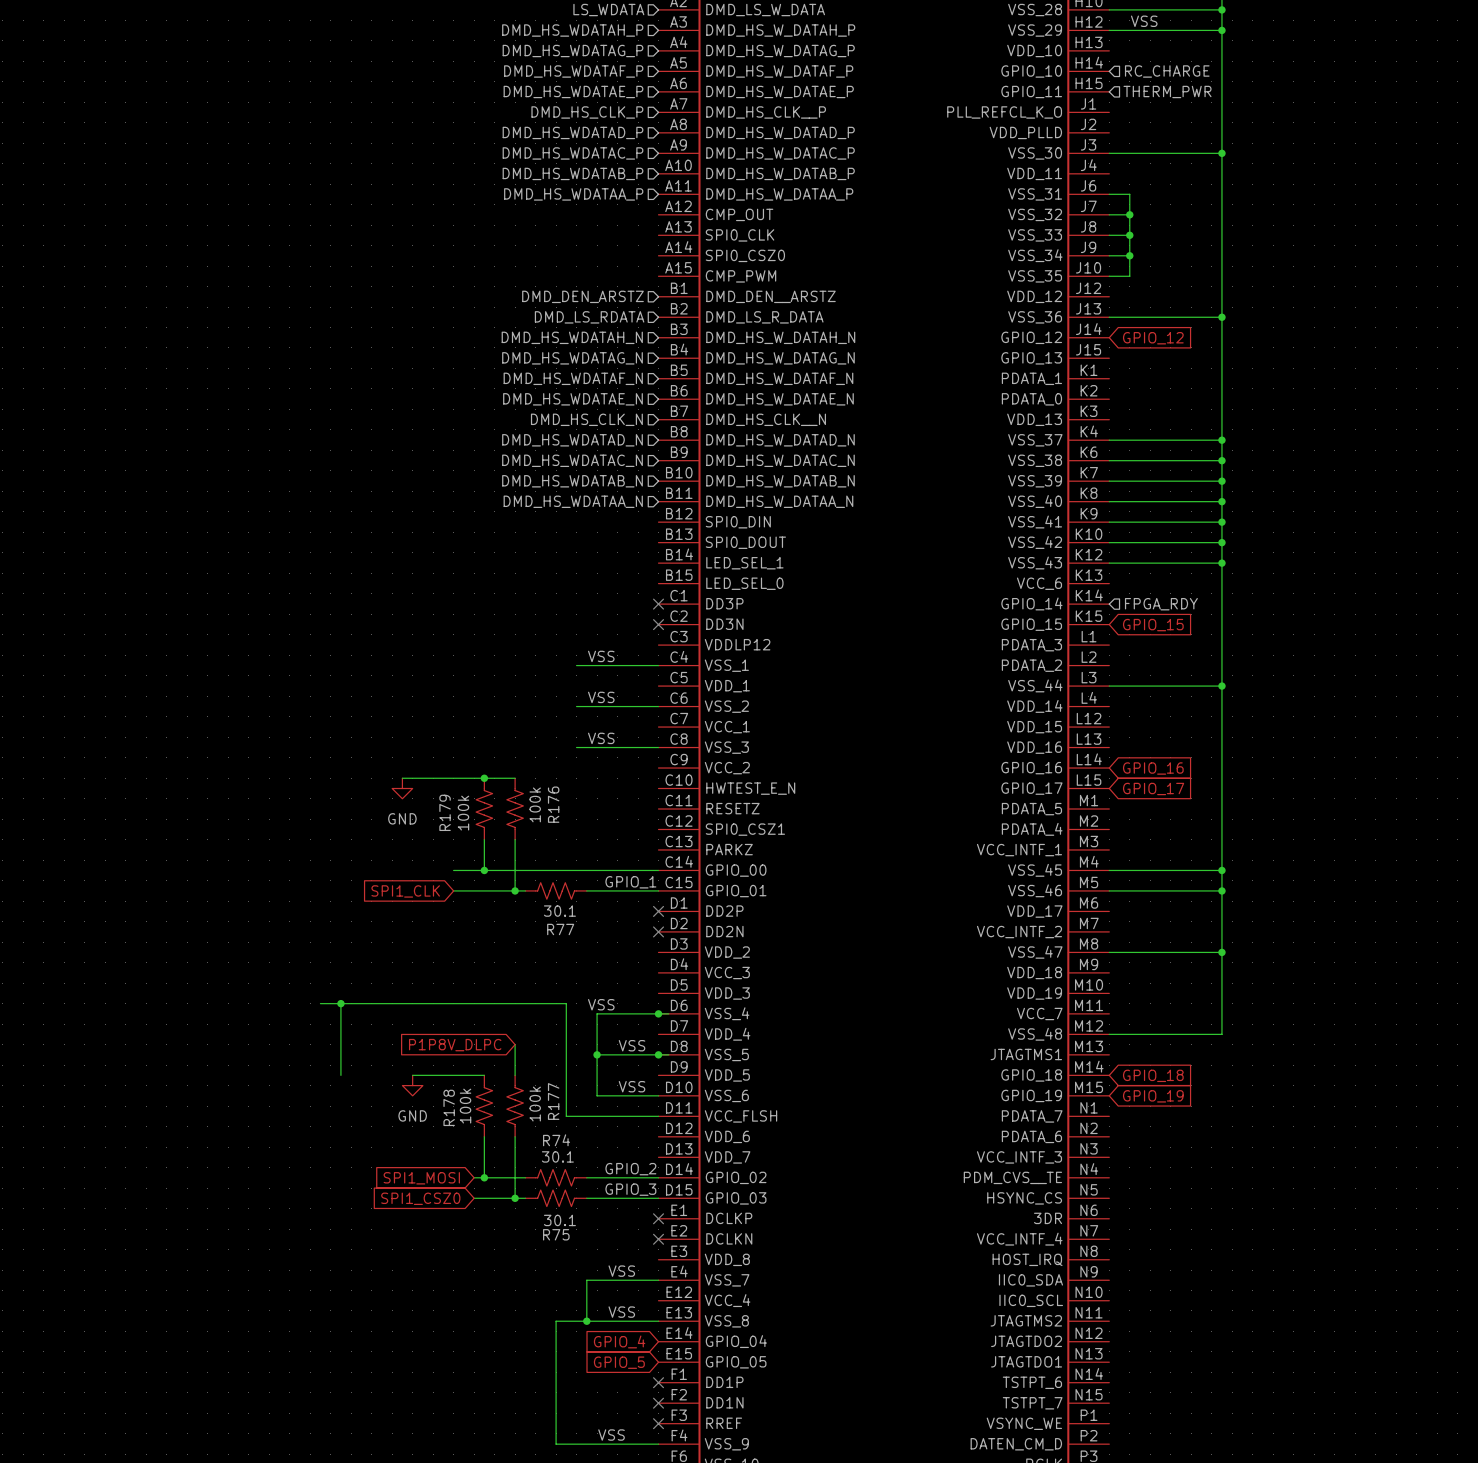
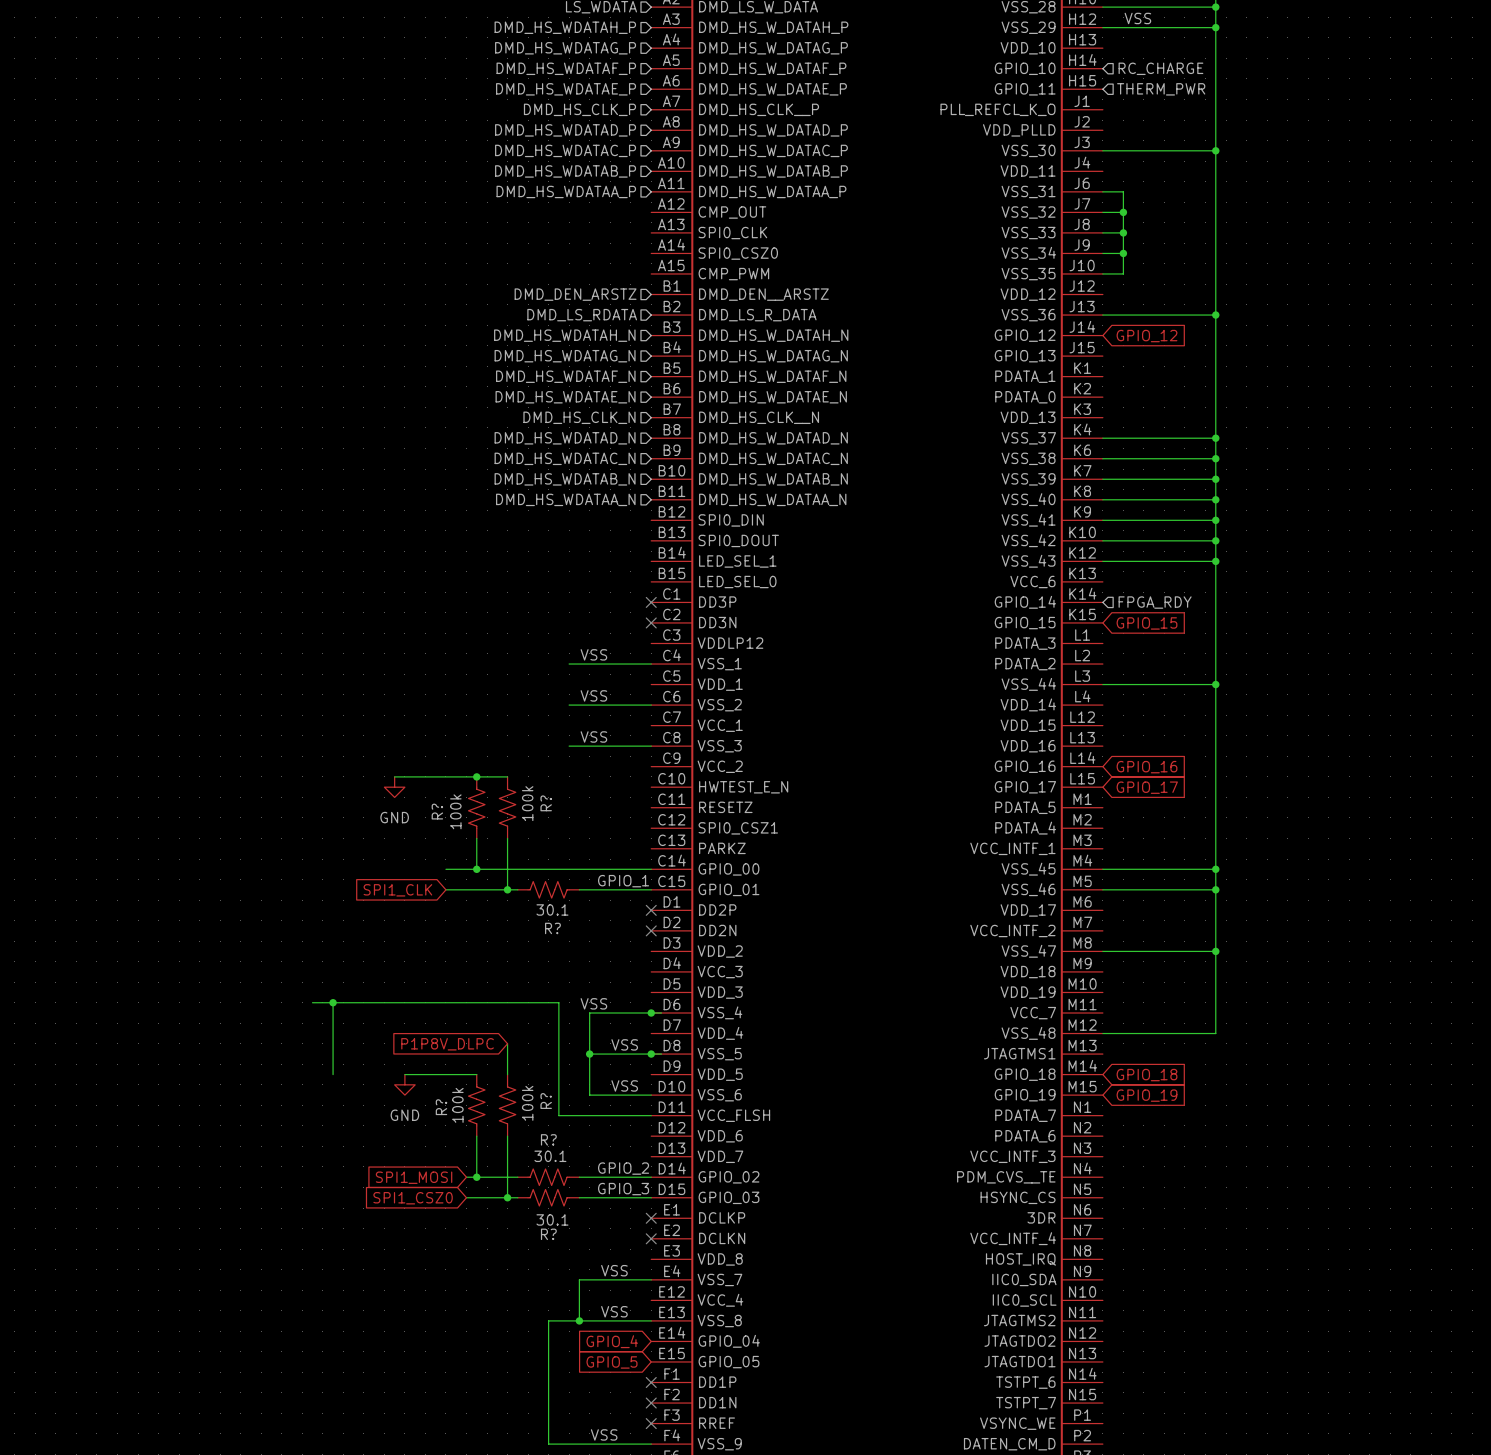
R176 name: R176 (553, 804) -> R? (546, 803)
R179 name: R179 (445, 812) -> R? (437, 811)
R77 name: R77 (560, 929) -> R? (552, 928)
R177 name: R177 (553, 1101) -> R? (546, 1101)
R178 name: R178 (449, 1107) -> R? (441, 1107)
R74 name: R74 (556, 1140) -> R? (548, 1139)
R75 name: R75 (556, 1234) -> R? (548, 1234)

